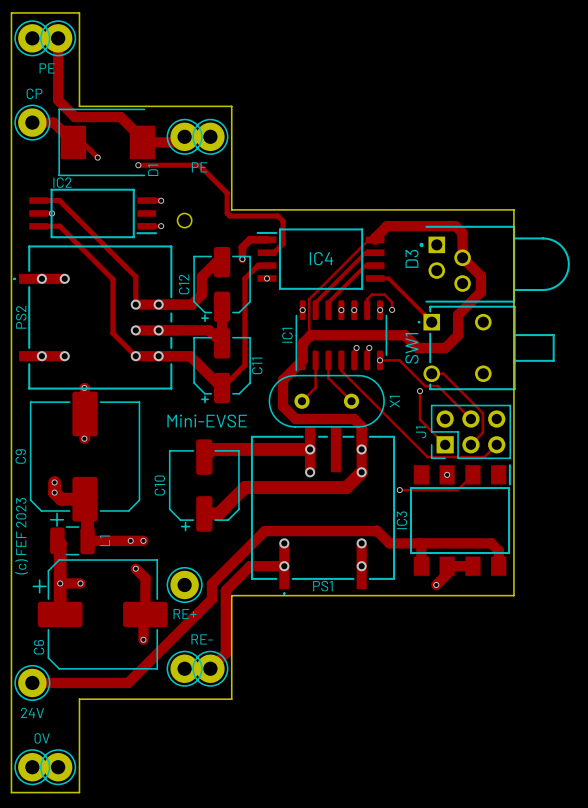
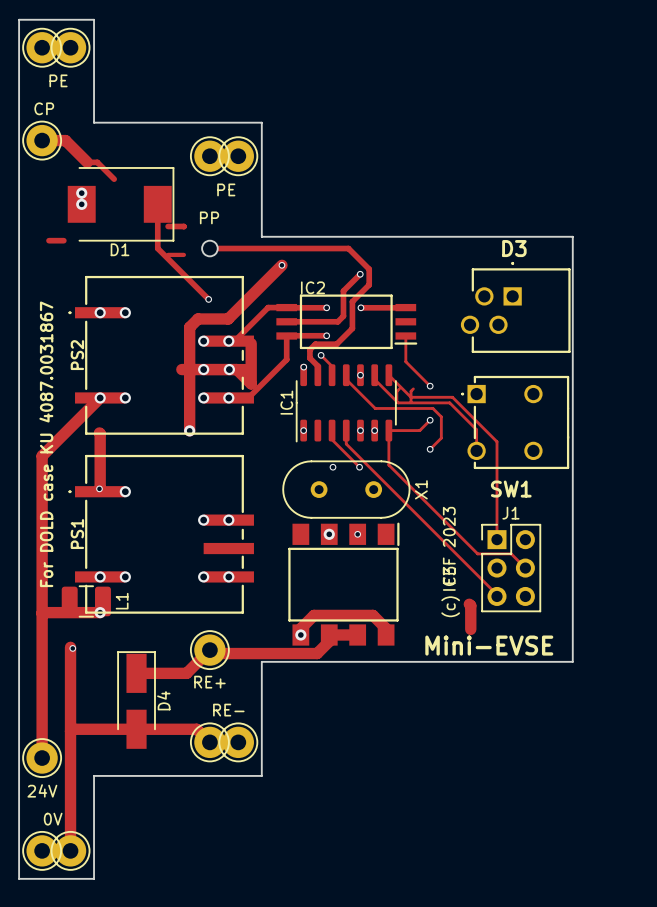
track: (58, 38) (58, 100) (74, 117) (120, 117) (142, 138) (142, 142) (179, 142) (184, 136) -> none
D1 rotation: 0° (106, 142) -> 180° (120, 204)
via: (97, 157) -> none
track: (138, 165) (199, 165) (227, 193) (227, 213) (229, 215) (277, 215) (283, 221) (283, 243) (274, 252) (267, 252) -> none
via: (138, 165) -> none
via: none -> (81, 193)
D1 name position: D1 (153, 170) -> D1 (120, 249)
via: none -> (81, 204)
track: none -> (157, 204) (157, 248) (208, 299)
text: none -> PP (209, 217)
track: (38, 200) (59, 200) (135, 276) (135, 304) -> none
via: (161, 200) -> none
via: (52, 213) -> none
IC2 position: (93, 213) -> (346, 321)
track: none -> (209, 248) (348, 248) (369, 269) (369, 284) (352, 301) (352, 328) (336, 344) (315, 344) (309, 349) (309, 358) (317, 366) (317, 375)
D3 footprint: [419, 225, 570, 303] -> [460, 262, 571, 353]
track: (38, 226) (59, 226) (112, 279) (112, 333) (135, 356) -> none
via: (161, 226) -> none
track: none -> (281, 265) (228, 318) (198, 318) (189, 327) (189, 430)
via: none -> (281, 265)
track: (267, 239) (249, 239) (242, 247) (242, 259) -> none
track: none -> (360, 274) (343, 291) (343, 316) (337, 321) (286, 321)
via: none -> (360, 274)
track: (375, 252) (365, 252) (315, 302) (315, 310) -> none
D3 name position: D3 (412, 258) -> D3 (514, 248)
via: (242, 259) -> none
IC4: (320, 259) -> none
track: (222, 262) (216, 262) (201, 276) (201, 294) (191, 304) (158, 304) -> none
track: (267, 265) (257, 265) (244, 278) (244, 365) (222, 388) (190, 356) (158, 356) -> none
track: (375, 265) (365, 265) (328, 302) (328, 310) -> none
via: none -> (208, 299)
track: none -> (326, 307) (268, 307) (234, 341) (228, 341)
via: none -> (326, 307)
via: none -> (360, 307)
track: none -> (405, 307) (360, 307)
via: (41, 278) -> none
via position: (64, 278) -> (100, 312)
via: none -> (125, 312)
via: (267, 278) -> none
track: (375, 278) (388, 278) (431, 322) -> none
C12: (222, 284) -> none
track: none -> (326, 335) (286, 335) (286, 359) (248, 397) (228, 397)
via: none -> (326, 335)
track: none -> (405, 336) (405, 361) (430, 386)
via: (135, 304) -> none
via: (158, 304) -> none
via: none -> (203, 341)
via: none -> (228, 341)
SW1 footprint: [418, 305, 555, 391] -> [461, 375, 570, 470]
track: (392, 309) (392, 302) (384, 294) (371, 294) (367, 299) (367, 310) -> none
via: (392, 309) -> none
via: (302, 310) -> none
via: (341, 310) -> none
via: (354, 310) -> none
via: (380, 310) -> none
PS2 position: (97, 317) -> (161, 355)
track: none -> (321, 355) (332, 366) (332, 375)
via: none -> (321, 355)
via: none -> (303, 367)
via: (135, 330) -> none
via: (158, 330) -> none
via: none -> (203, 369)
via: none -> (229, 369)
track: none -> (346, 375) (346, 379) (375, 408) (432, 408) (441, 416) (441, 438) (430, 449)
track: (310, 335) (309, 333) (309, 299) (368, 239) (375, 239) (387, 226) (455, 226) (462, 233) (462, 257) (480, 276) (480, 292) (458, 314) (458, 335) (445, 347) (417, 347) (404, 335) (310, 335) -> none
track: (310, 335) (302, 343) (302, 360) (283, 380) (283, 406) (295, 419) (354, 419) (361, 426) (361, 449) -> none
via: none -> (360, 375)
track: none -> (374, 375) (374, 379) (398, 402) (449, 402) (476, 429) (476, 450)
IC1 position: (341, 335) -> (346, 403)
track: none -> (388, 375) (410, 397) (452, 397) (497, 441) (497, 539)
via: none -> (430, 386)
via: (356, 347) -> none
via: (369, 347) -> none
SW1 name position: SW1 (411, 348) -> SW1 (511, 489)
via: (41, 356) -> none
via position: (64, 356) -> (100, 397)
via: none -> (125, 397)
via: (135, 356) -> none
via: (158, 356) -> none
via: none -> (203, 397)
via: none -> (228, 397)
track: (315, 360) (315, 387) (301, 401) -> none
track: (328, 360) (328, 378) (351, 401) -> none
track: (341, 360) (341, 370) (427, 457) (484, 457) (496, 444) -> none
track: (380, 360) (399, 360) (425, 386) (437, 386) (470, 419) -> none
via: (380, 360) -> none
C11: (222, 365) -> none
track: (431, 373) (443, 373) (482, 413) (482, 432) (470, 444) -> none
track: none -> (430, 420) (419, 430) (388, 430) (388, 465) (477, 553) (511, 553) (525, 568)
via: none -> (430, 420)
via: none -> (303, 430)
track: none -> (332, 430) (332, 439) (359, 467)
track: none -> (346, 430) (346, 444) (497, 596)
via: none -> (360, 430)
via: none -> (374, 430)
via: none -> (189, 430)
via: (84, 387) -> none
track: (420, 391) (420, 419) (445, 444) -> none
via: (420, 391) -> none
text: none -> For DOLD case KU 4087.0031867 (46, 444)
X1 position: (326, 401) -> (346, 489)
via: none -> (430, 449)
via: none -> (332, 467)
via: none -> (359, 467)
text: Mini-EVSE (207, 421) -> none
J1 rotation: 0° (470, 431) -> 90° clockwise (511, 568)
J1 position: (470, 431) -> (511, 568)
via: none -> (125, 491)
track: (310, 449) (211, 449) (204, 457) -> none
via: (310, 449) -> none
via: (361, 449) -> none
C9: (85, 459) -> none
via: none -> (203, 520)
via: none -> (228, 520)
via: (310, 472) -> none
track: (361, 472) (346, 487) (244, 487) (218, 513) (204, 513) -> none
via: (361, 472) -> none
via: (447, 474) -> none
track: (472, 474) (457, 490) (399, 490) -> none
via: none -> (329, 534)
via: none -> (357, 534)
track: (54, 482) (54, 492) (61, 499) (85, 499) (87, 501) (87, 540) (143, 540) -> none
via: (54, 482) -> none
C10: (204, 485) -> none
via: (399, 490) -> none
via: (54, 492) -> none
text: none -> (c) FEF 2023 (450, 562)
PS1 rotation: 0° (322, 510) -> 90° clockwise (161, 534)
PS1 position: (322, 510) -> (161, 534)
via: none -> (100, 576)
via: none -> (125, 576)
via: none -> (203, 576)
via: none -> (228, 576)
IC3 position: (460, 520) -> (343, 584)
text: (c) FEF 2023 (21, 536) -> none
track: (57, 540) (60, 543) (60, 614) -> none
via: (130, 540) -> none
via: (143, 540) -> none
via: (284, 543) -> none
via: (361, 543) -> none
track: none -> (100, 612) (42, 613)
via: none -> (100, 612)
track: (284, 566) (250, 566) (225, 590) (225, 653) (210, 668) -> none
via: (284, 566) -> none
via: (361, 566) -> none
track: (472, 566) (447, 566) (447, 574) (436, 584) -> none
track: (498, 566) (498, 550) (491, 543) (389, 543) (376, 530) (264, 531) (211, 583) (211, 599) (128, 682) (32, 682) -> (100, 397) (42, 456) (42, 758)
track: (135, 568) (145, 578) (143, 639) -> none
via: (135, 568) -> none
track: none -> (300, 635) (300, 628) (313, 615) (372, 615) (386, 628) (386, 635)
via: none -> (300, 635)
track: none -> (357, 635) (329, 635) (329, 641) (317, 653) (213, 653) (209, 650) (186, 673) (136, 673)
text: none -> Mini-EVSE (489, 645)
track: none -> (70, 647) (70, 850)
track: (60, 583) (80, 583) -> none
via: (80, 583) -> none
via: (436, 584) -> none
C6: (100, 614) -> none
D4: none -> (136, 700)
via: (143, 639) -> none
track: none -> (70, 731) (72, 729) (196, 729) (209, 742)

